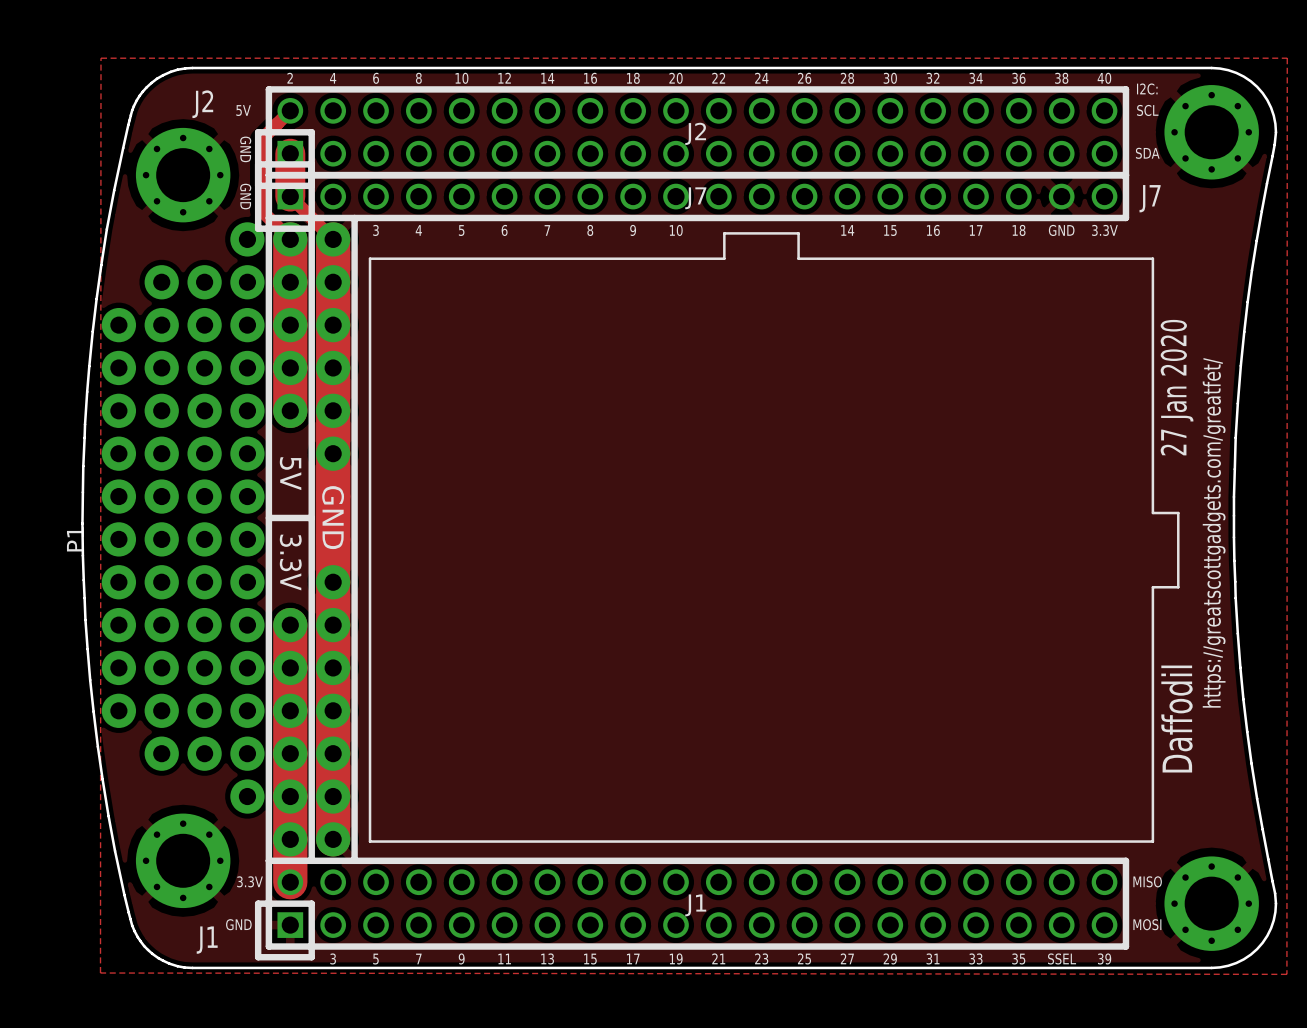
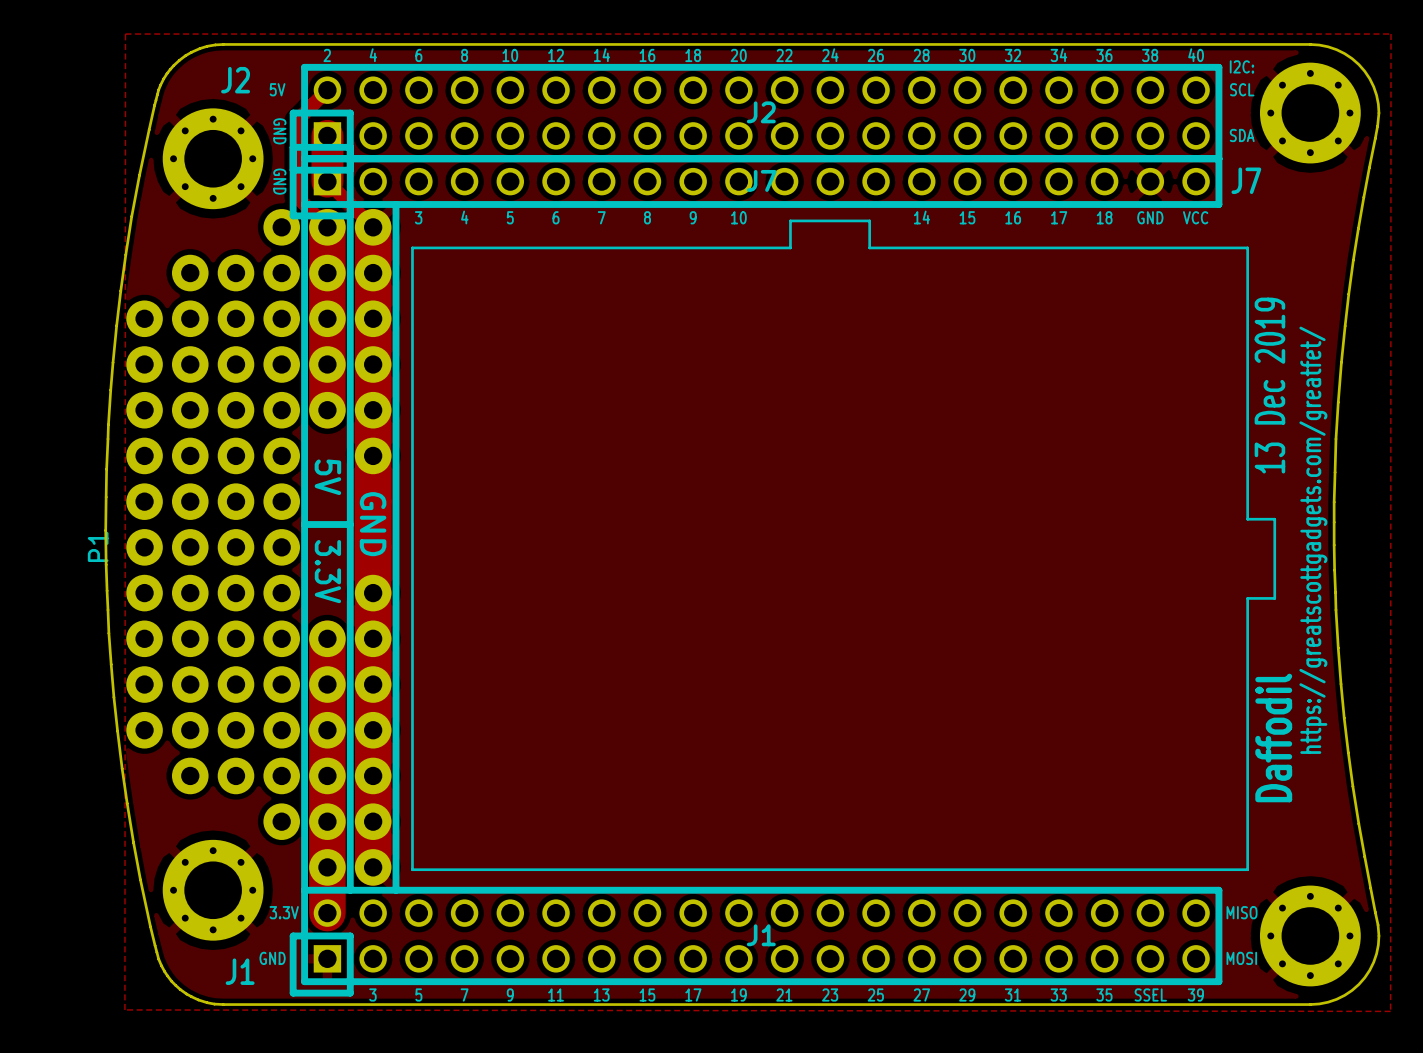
text: 3.3V (1104, 230) -> VCC (1195, 217)
text: 27 Jan 2020 (1177, 387) -> 13 Dec 2019 (1269, 385)

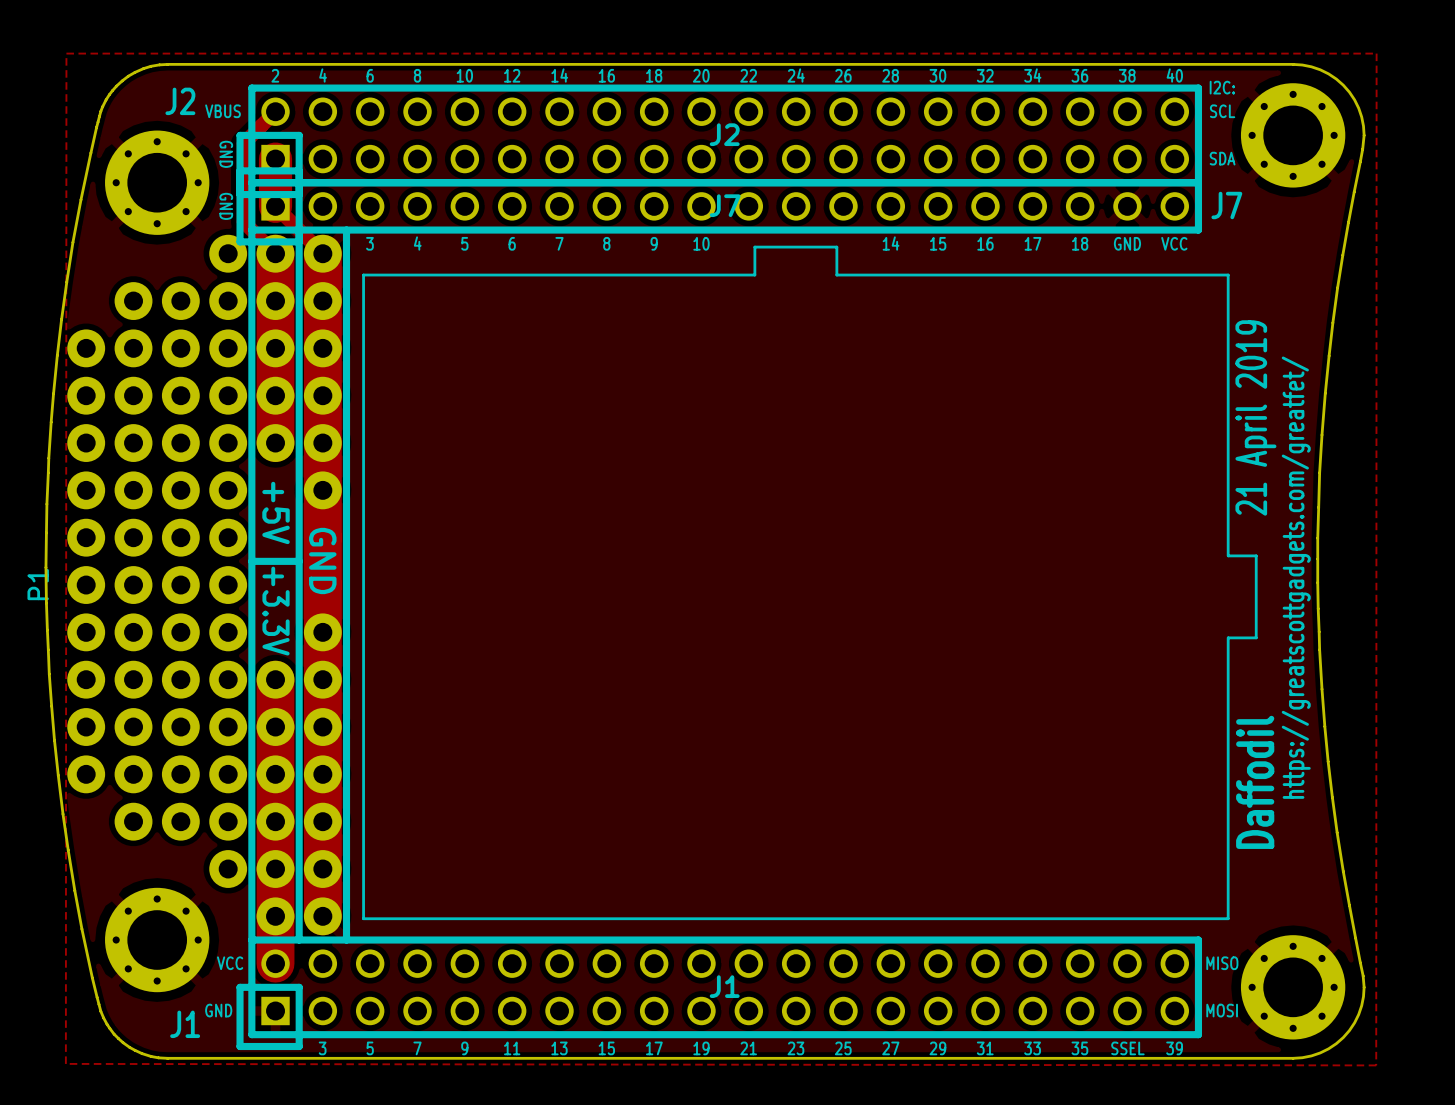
text: 5V (277, 89) -> VBUS (223, 111)
text: 13 Dec 2019 (1269, 385) -> 21 April 2019 (1255, 417)
text: 5V (327, 477) -> +5V (276, 512)
text: 3.3V (327, 571) -> +3.3V (276, 611)
text: 3.3V (284, 912) -> VCC (230, 963)

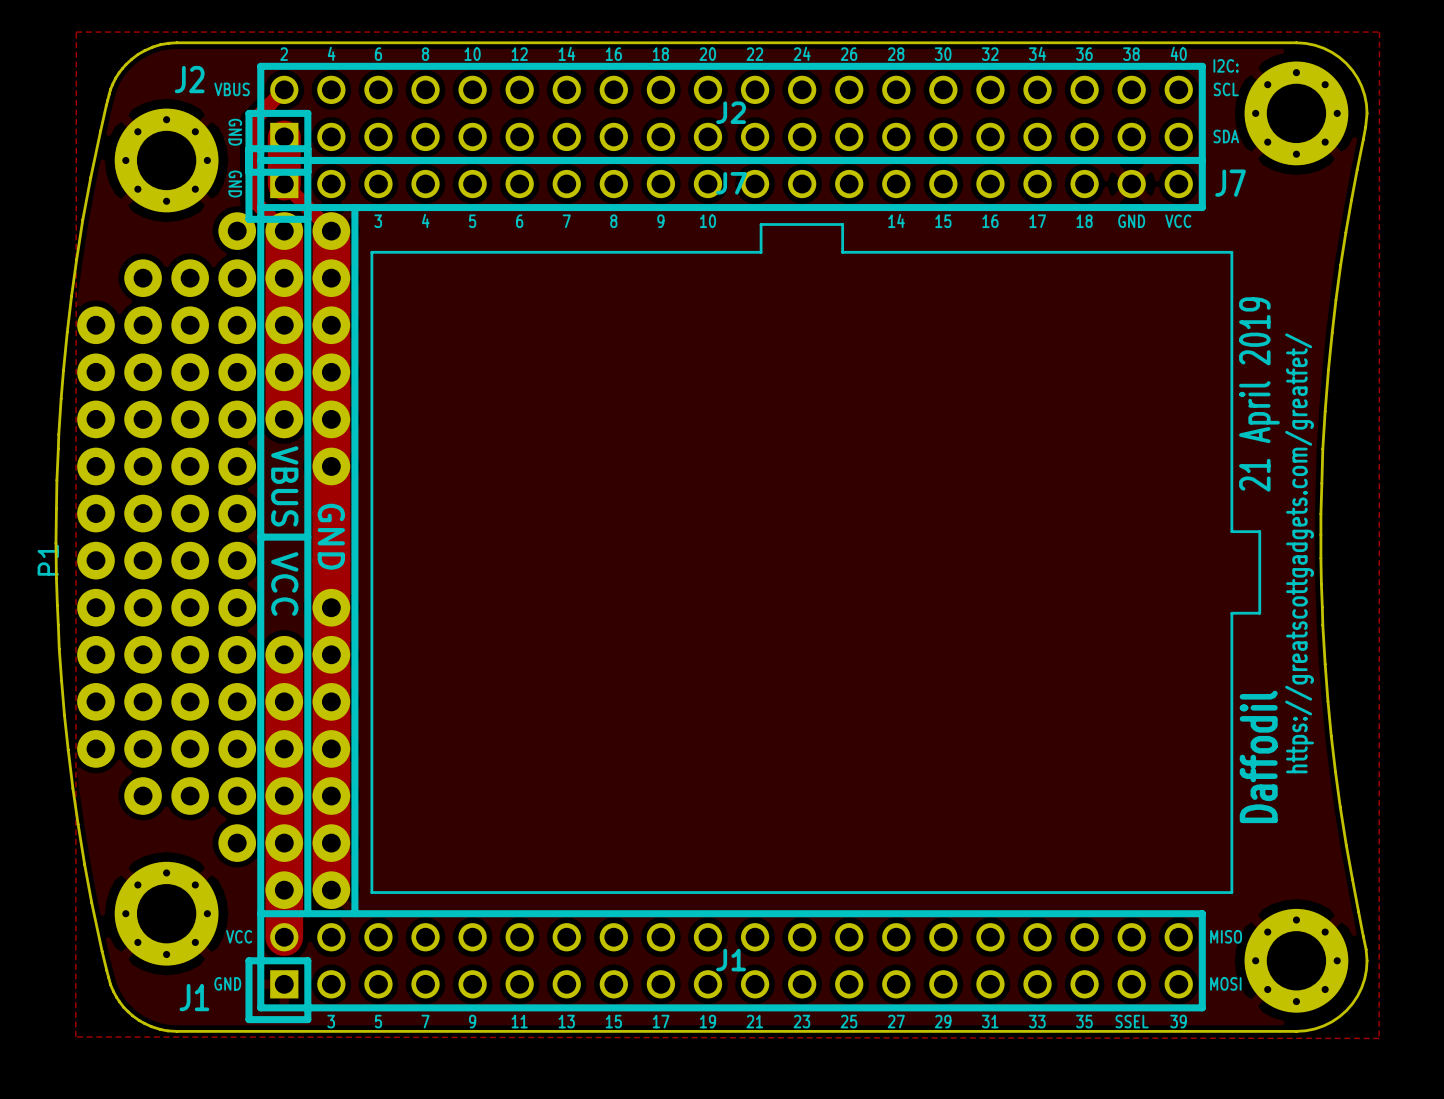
text: +5V (276, 512) -> VBUS (284, 486)
text: +3.3V (276, 611) -> VCC (284, 583)

